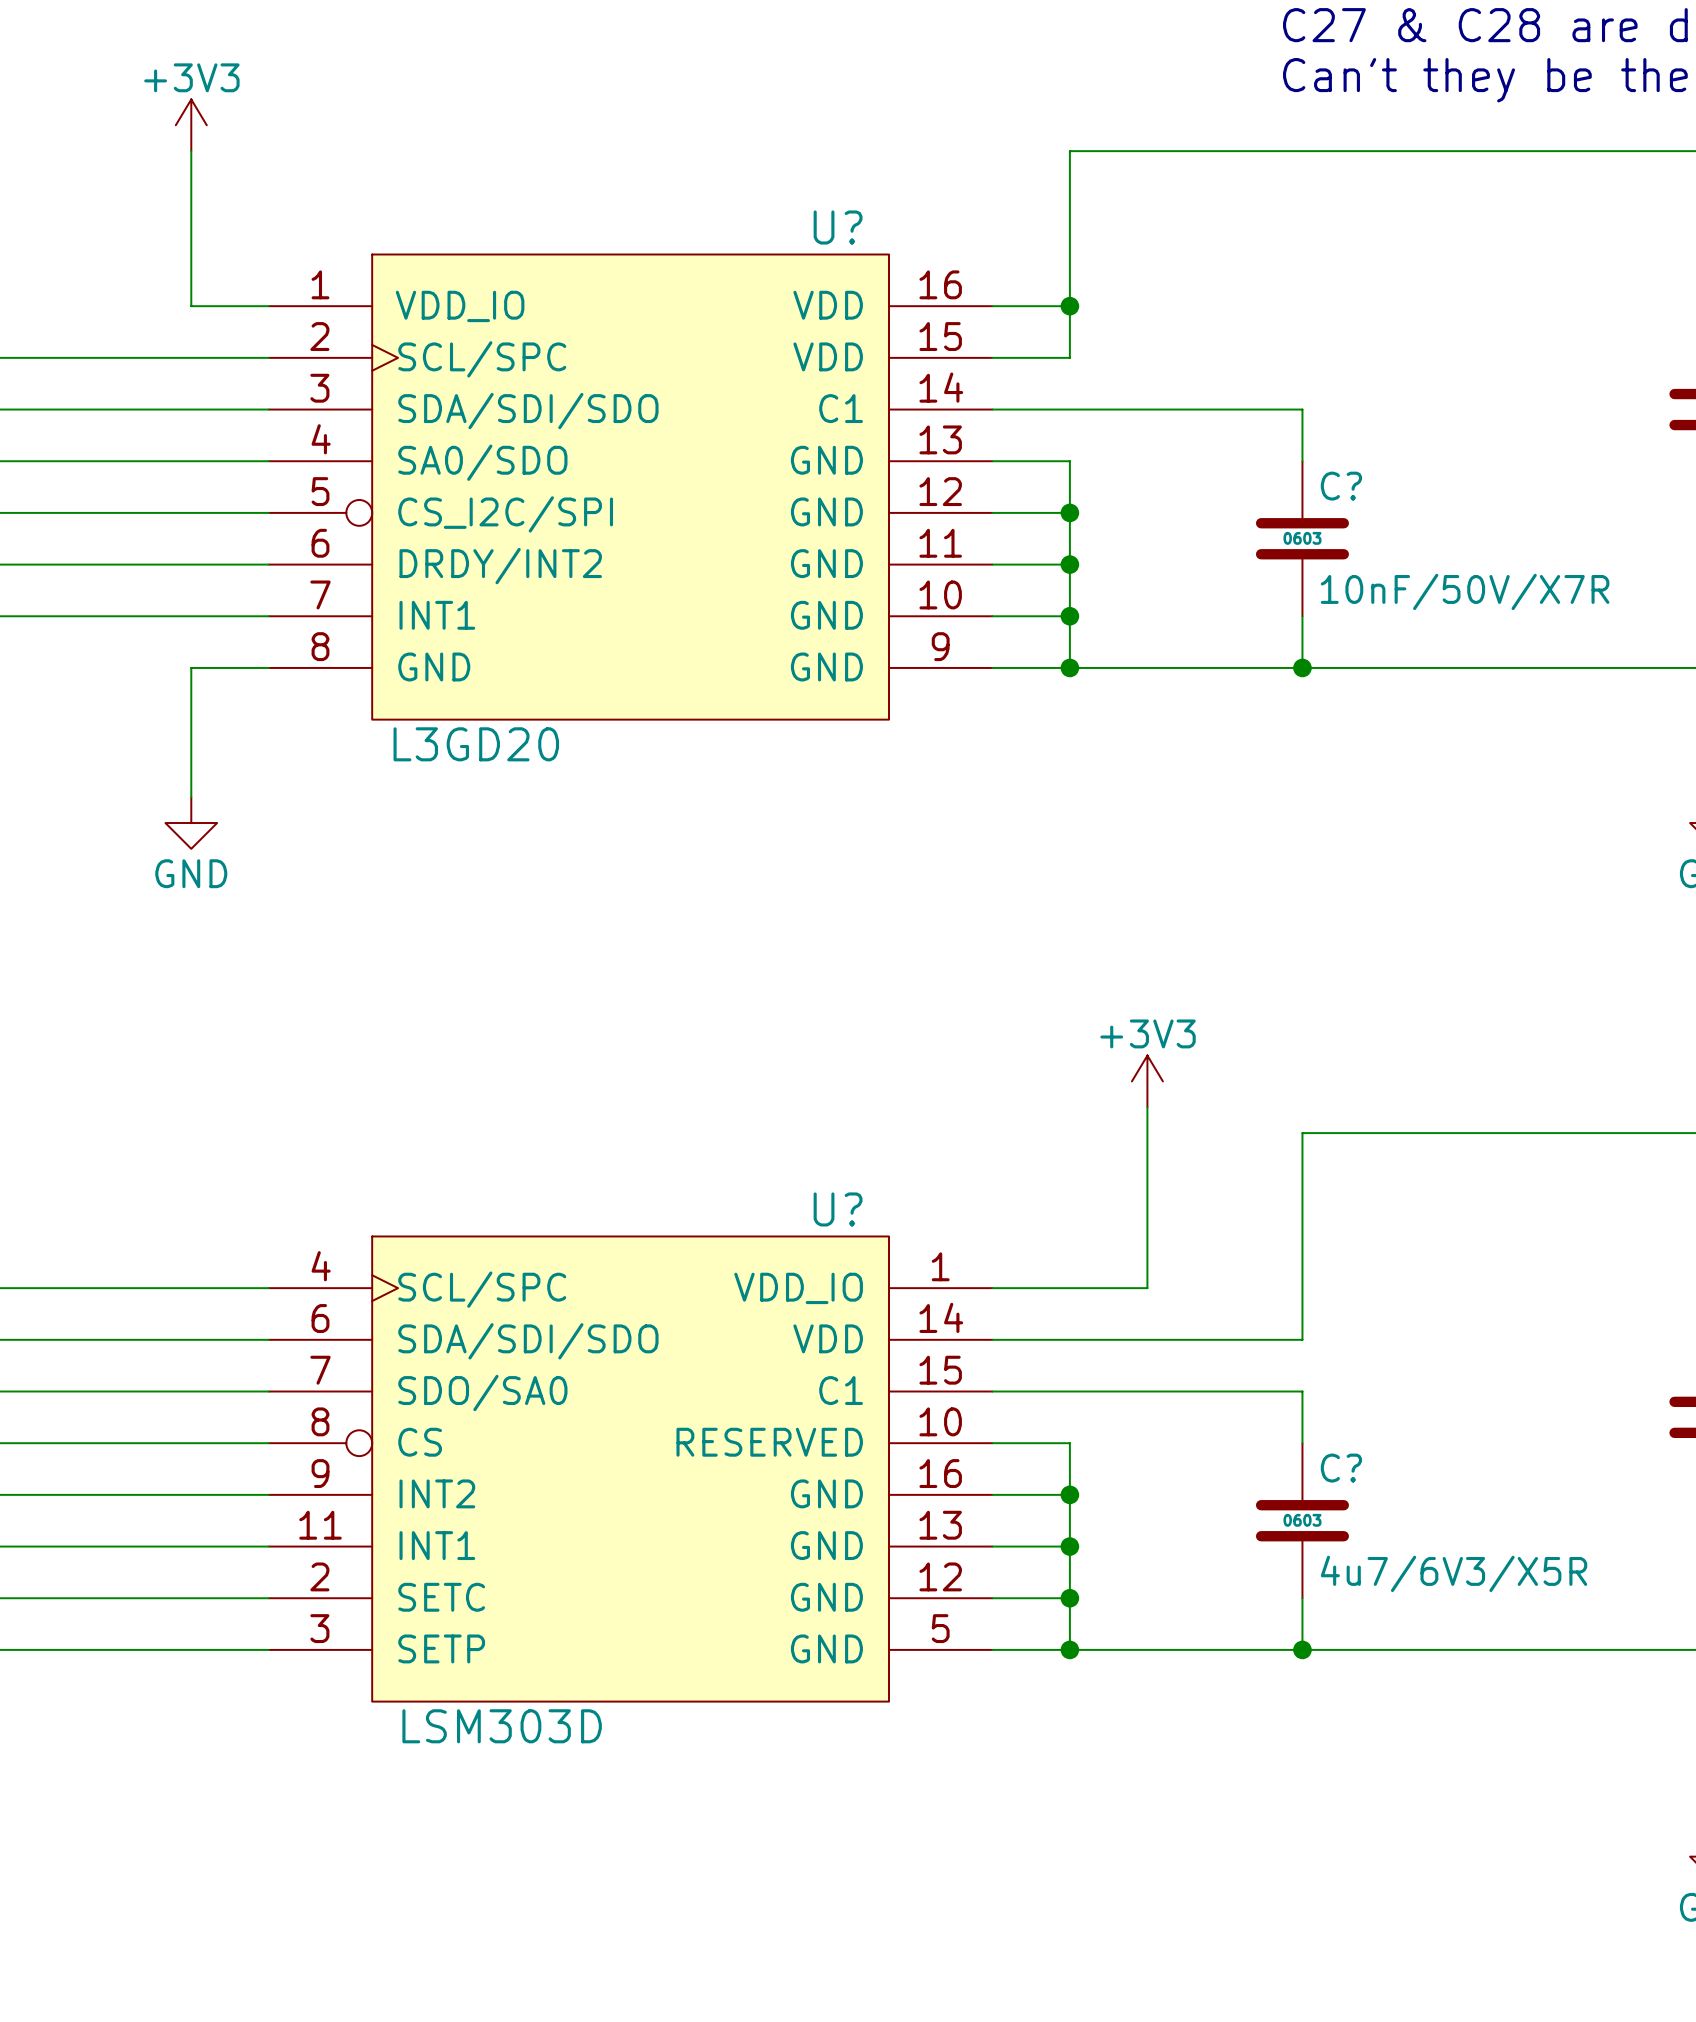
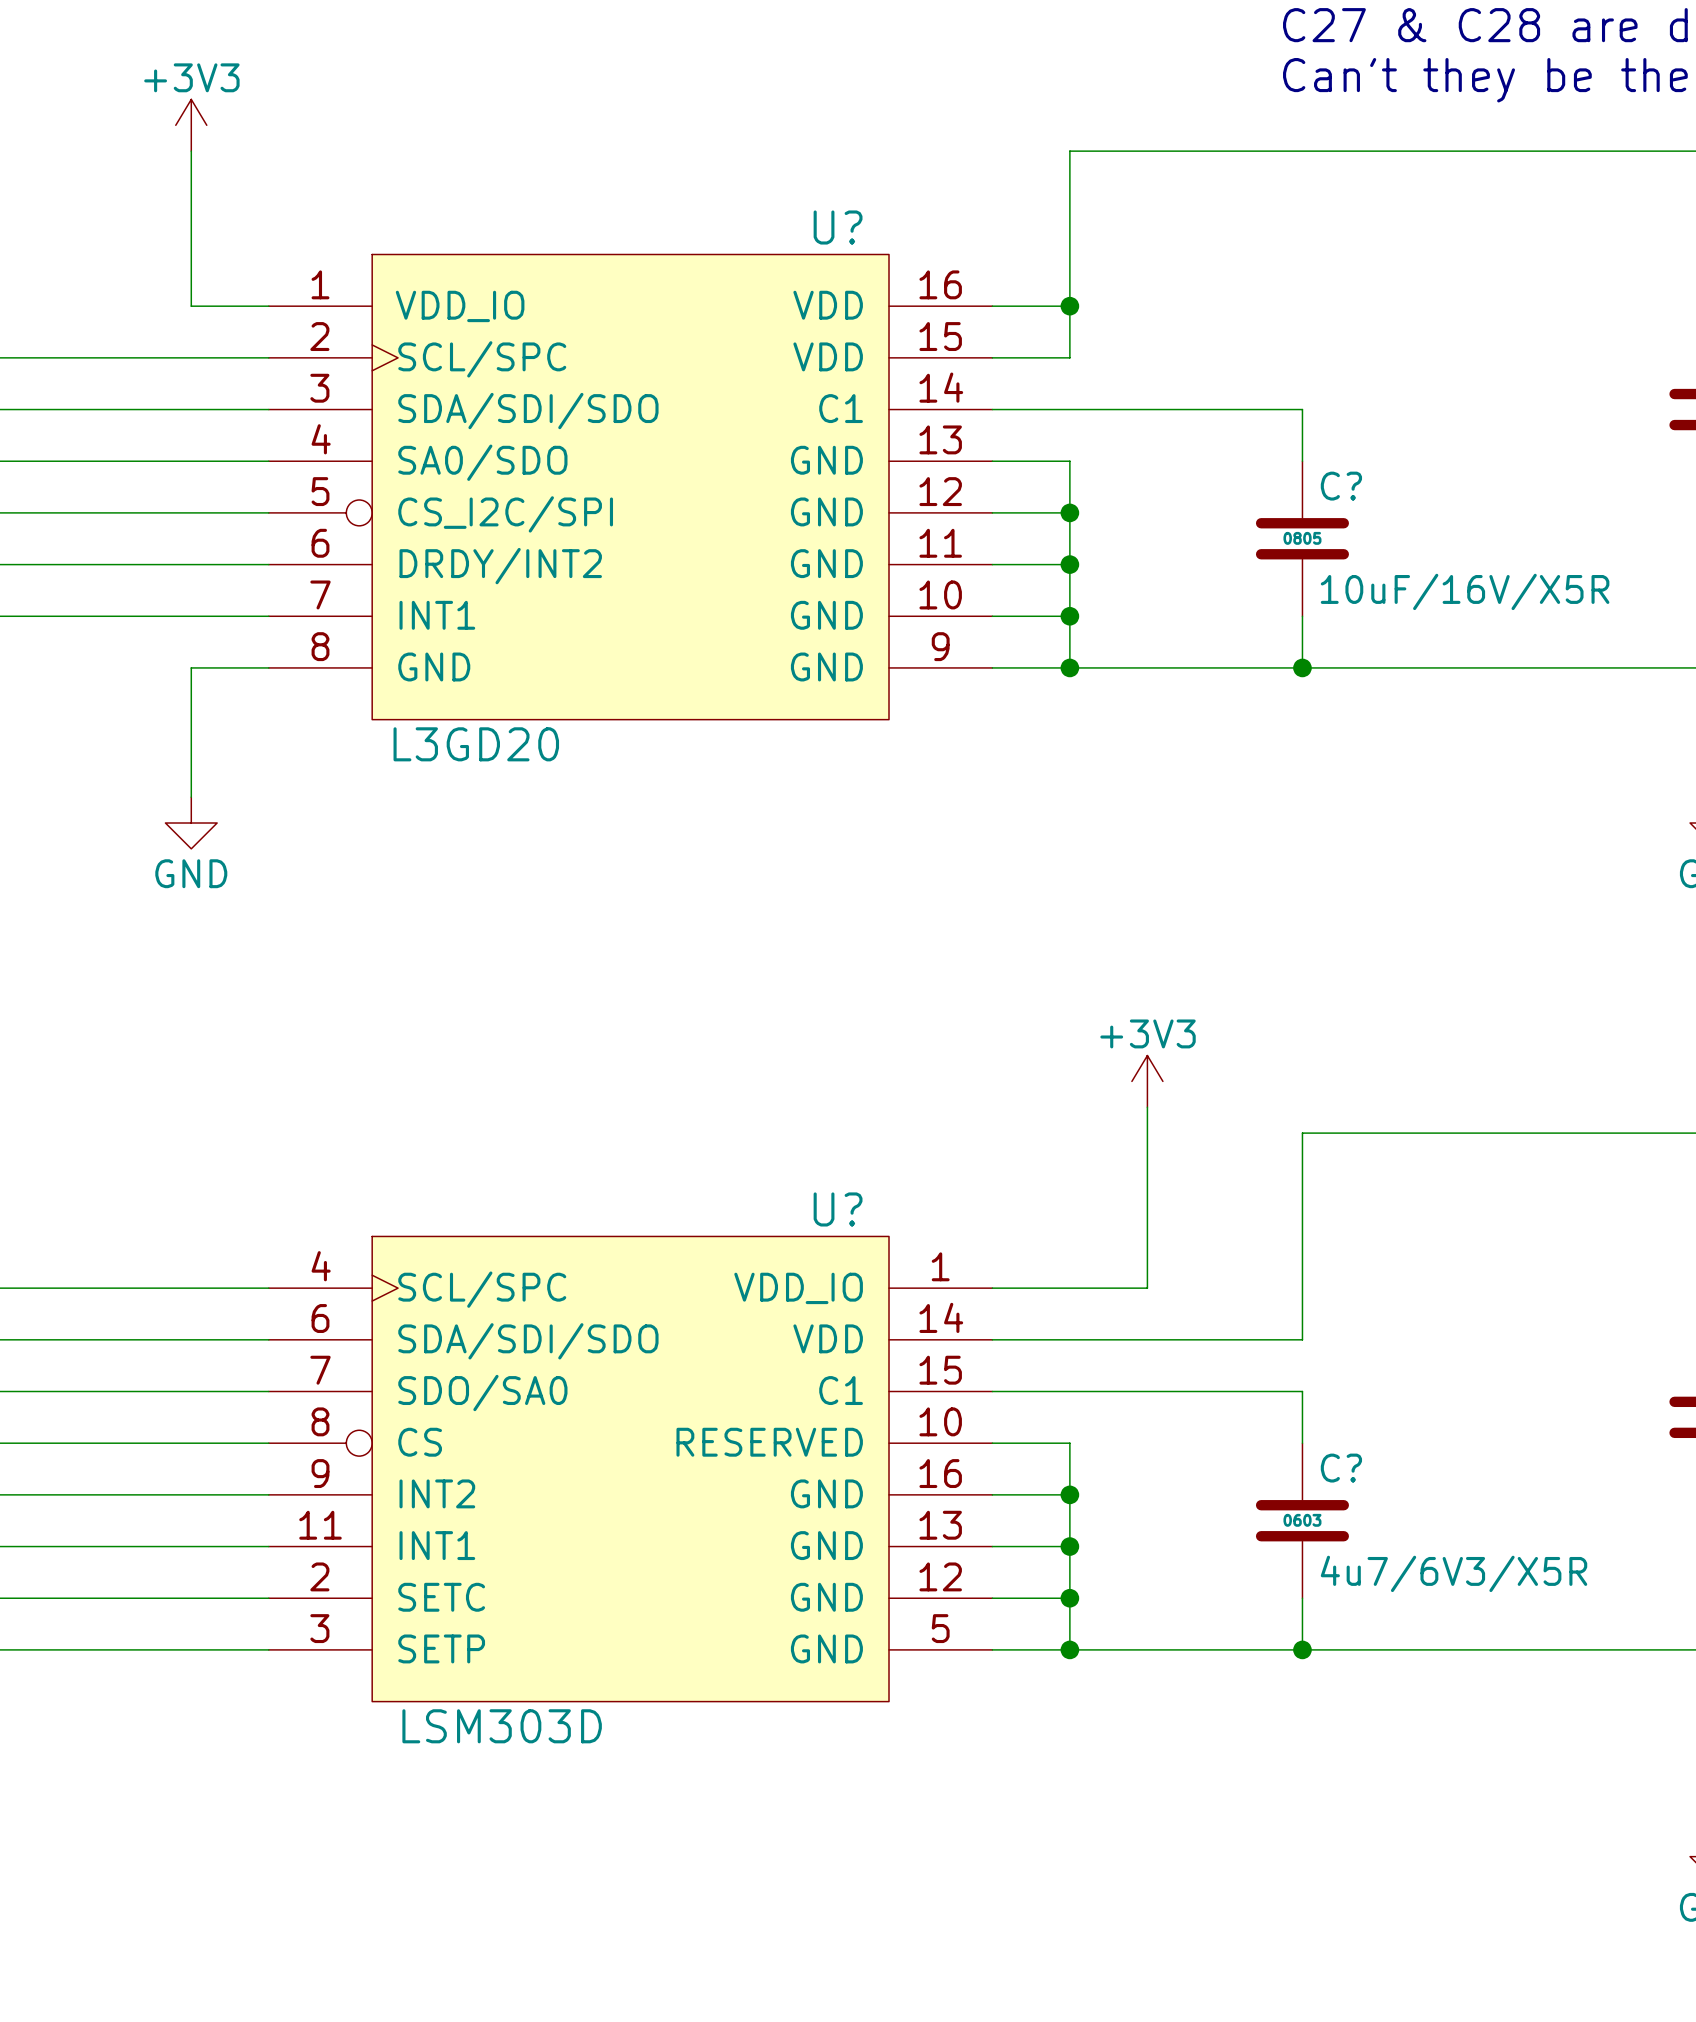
C? text: 0603 (1302, 538) -> 0805 (1302, 538)
C? value: 10nF/50V/X7R (1465, 591) -> 10uF/16V/X5R (1465, 591)

